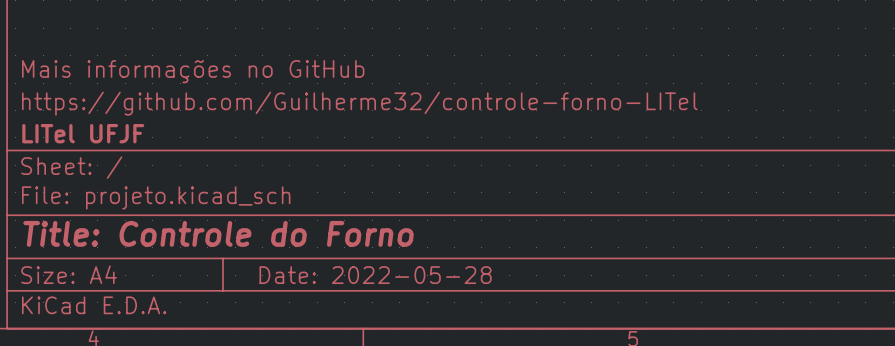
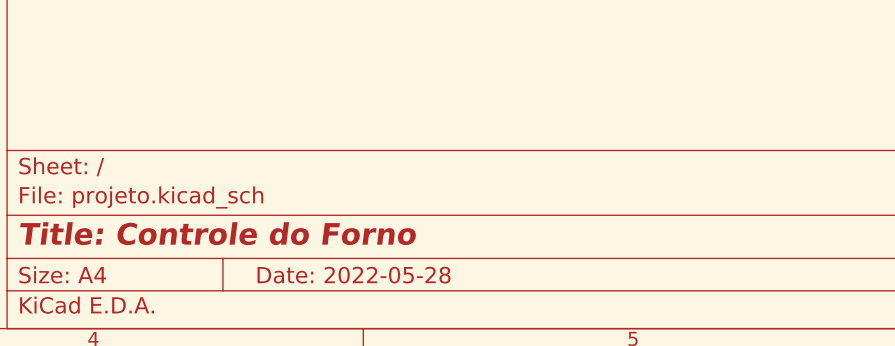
title block: Mais informações no GitHub (193, 71) -> none
title block: https://github.com/Guilherme32/controle-forno-LITel (359, 103) -> none
title block: LITel UFJF (83, 133) -> none

